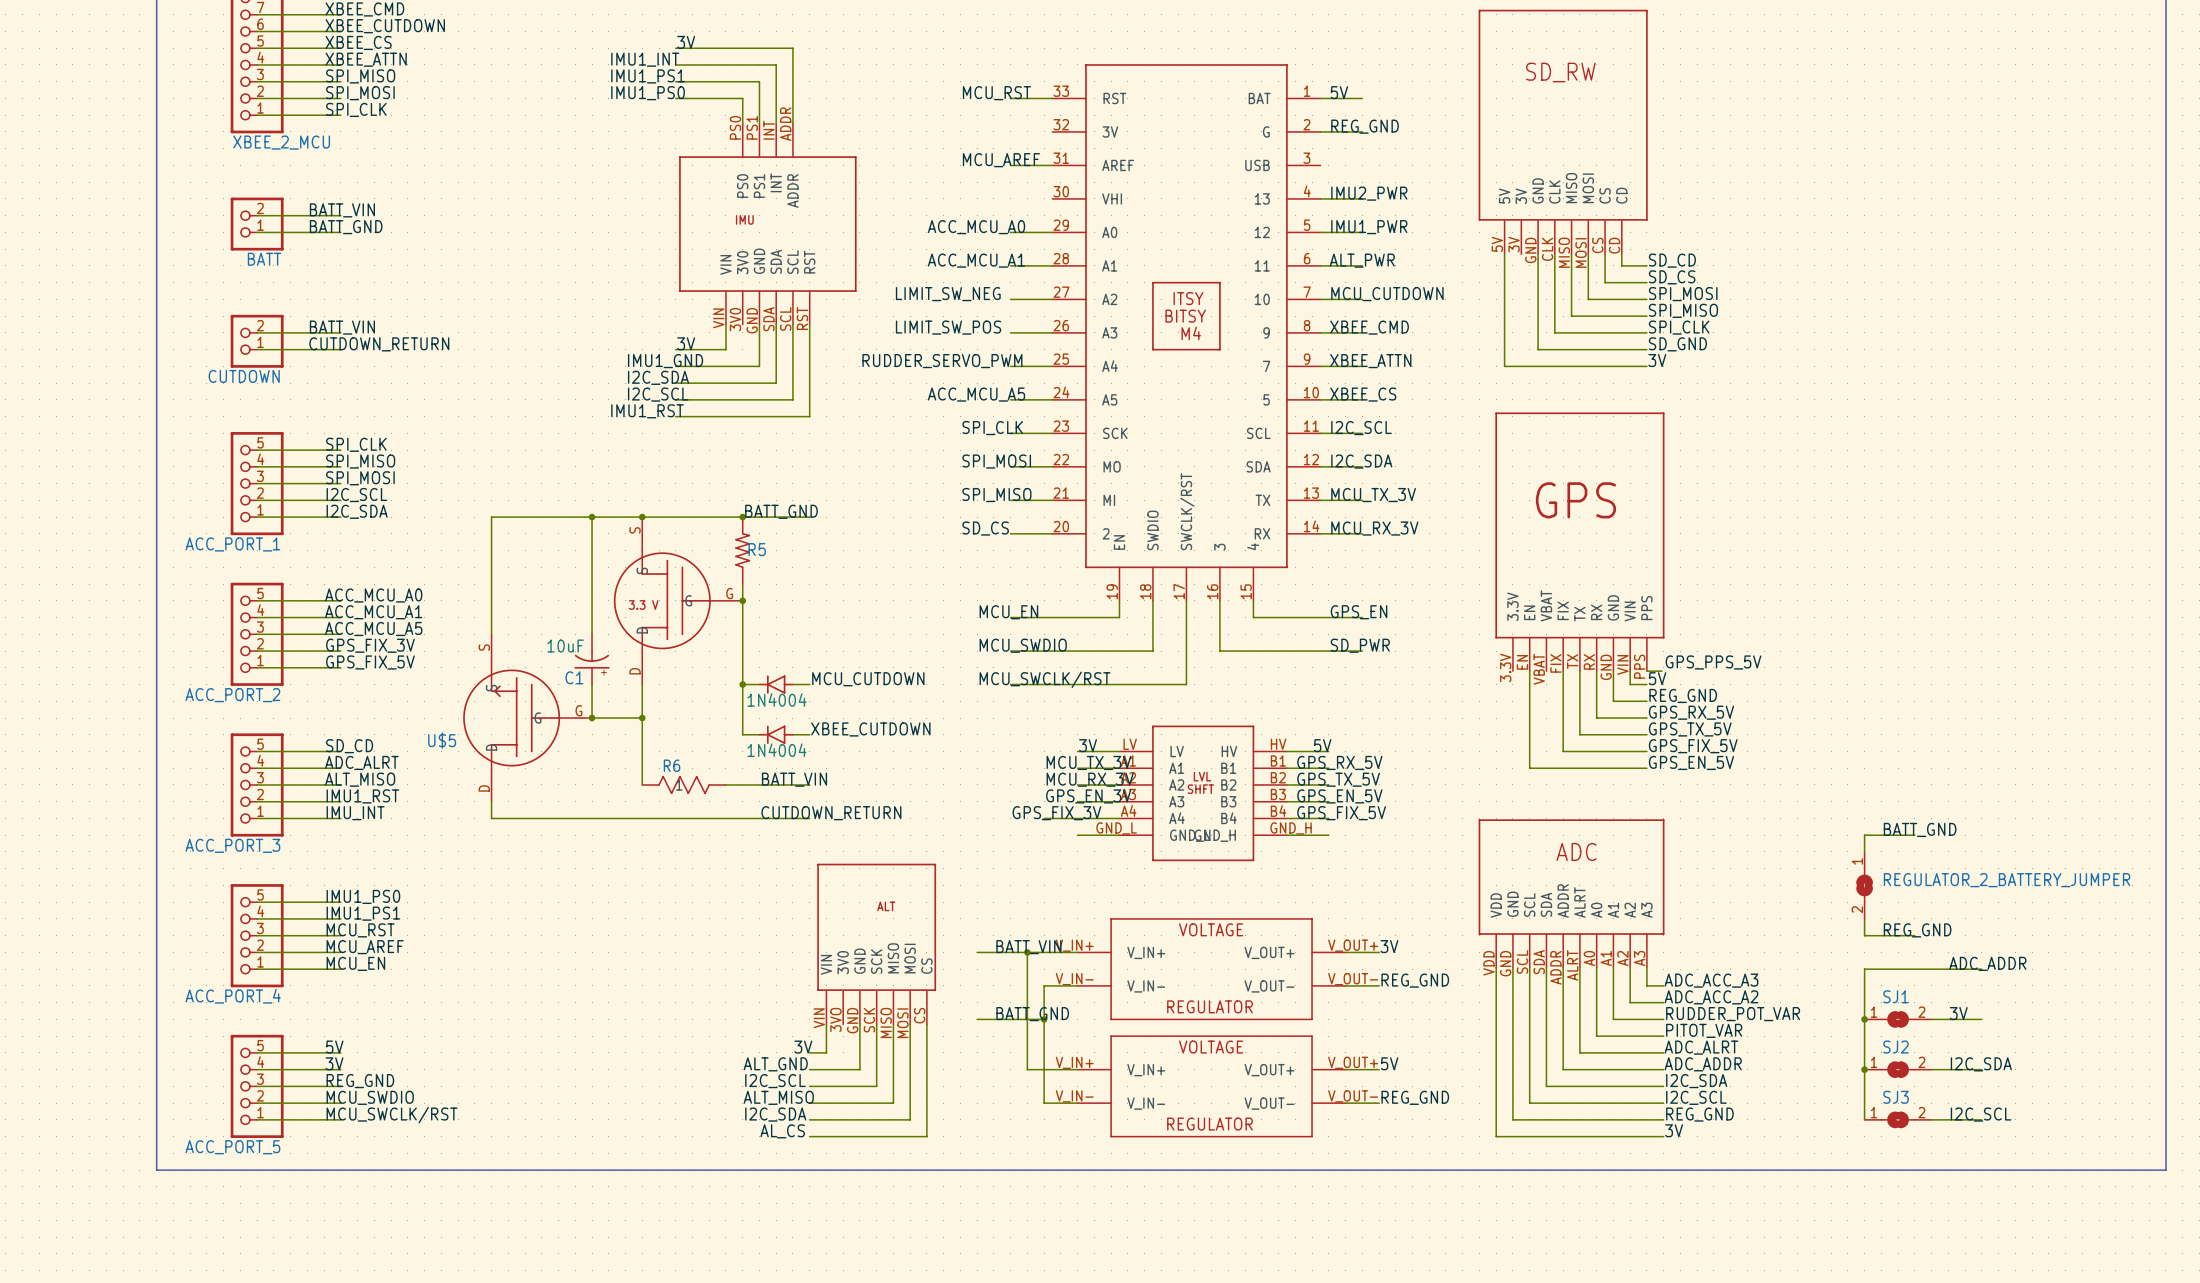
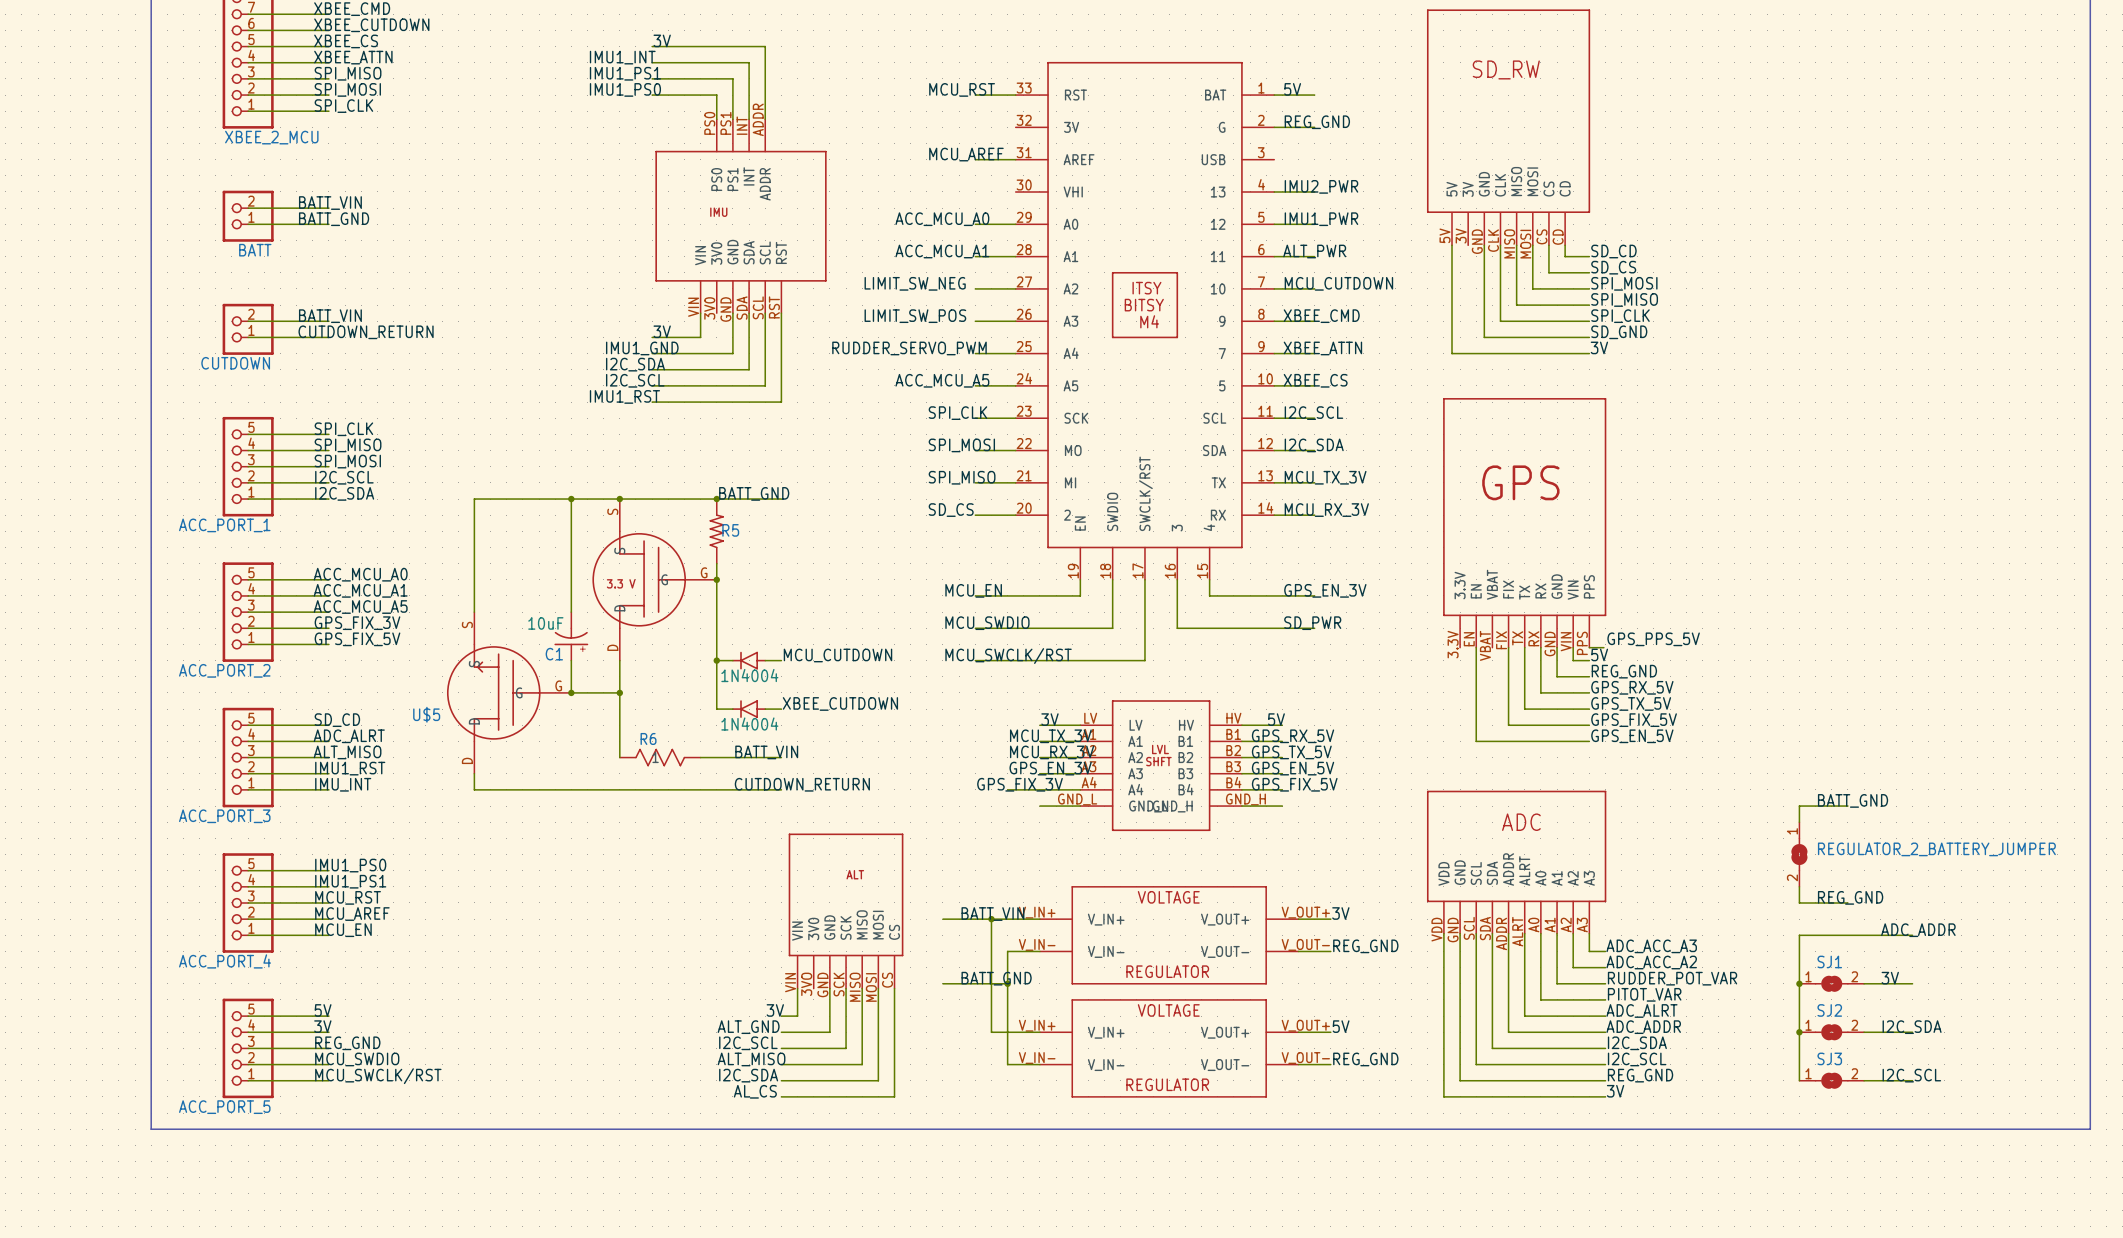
label: GPS_EN (1359, 612) -> GPS_EN_3V (1325, 590)

